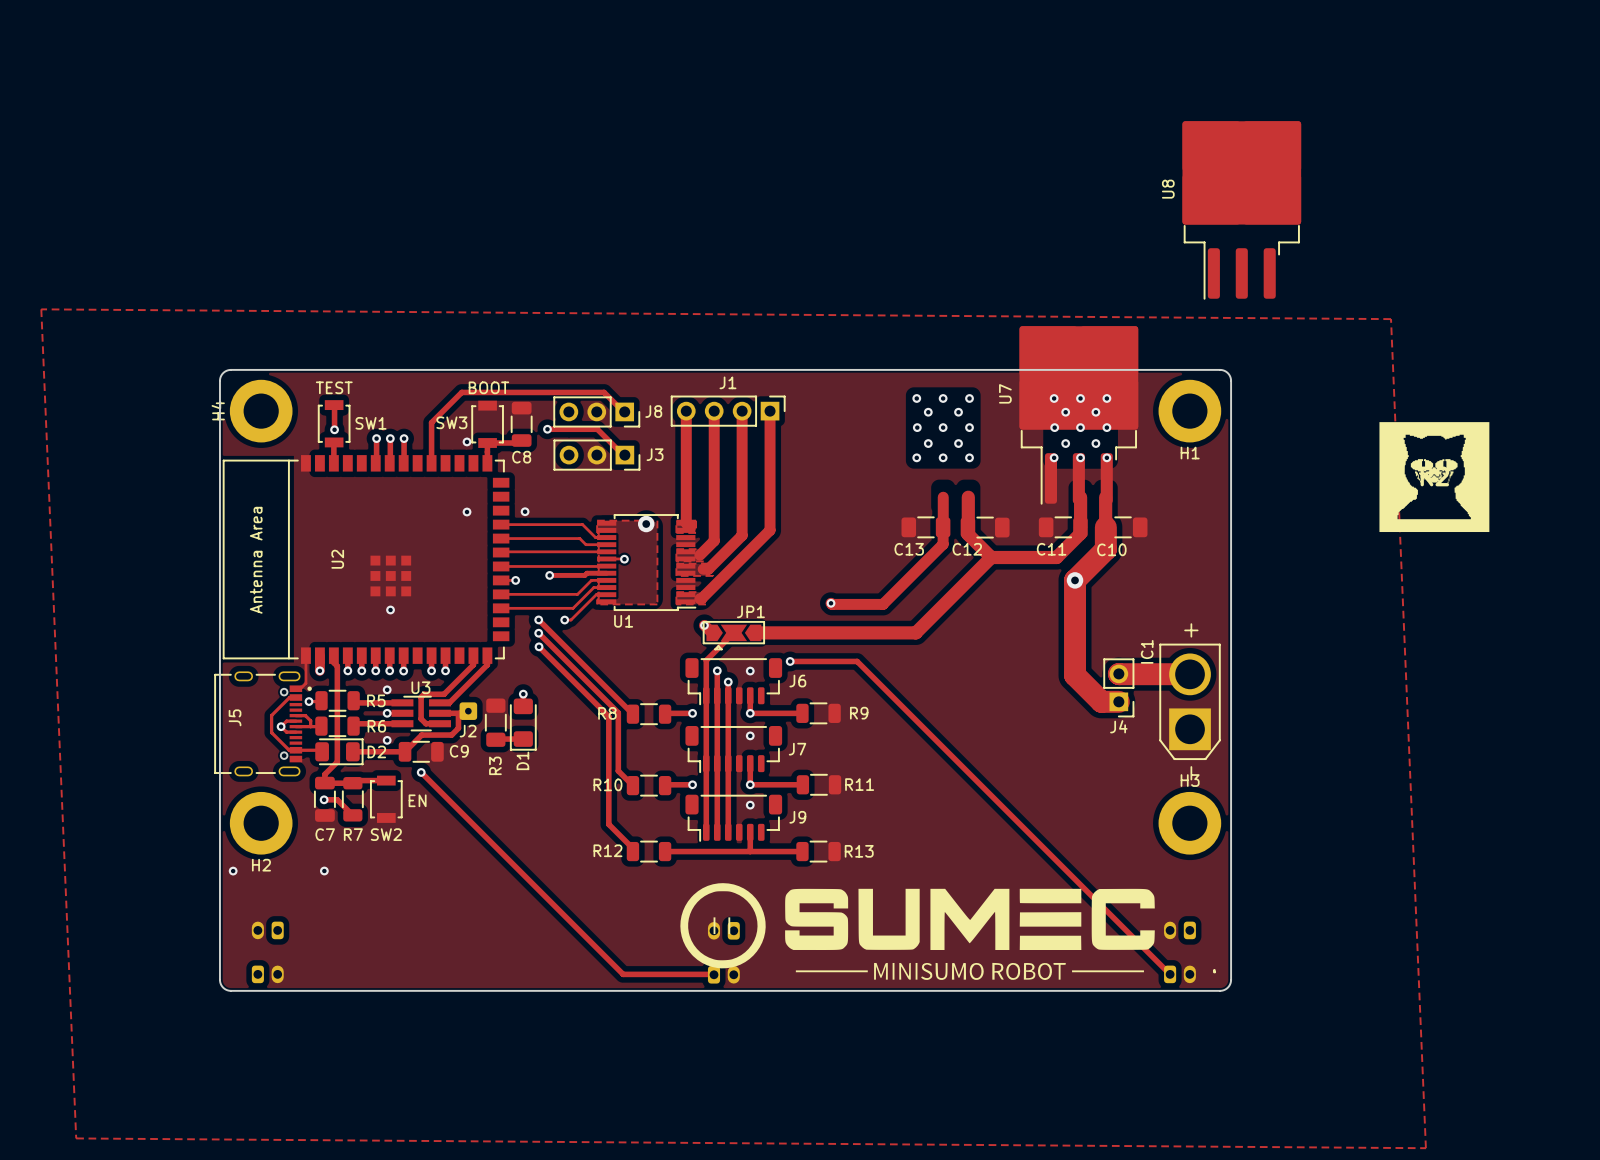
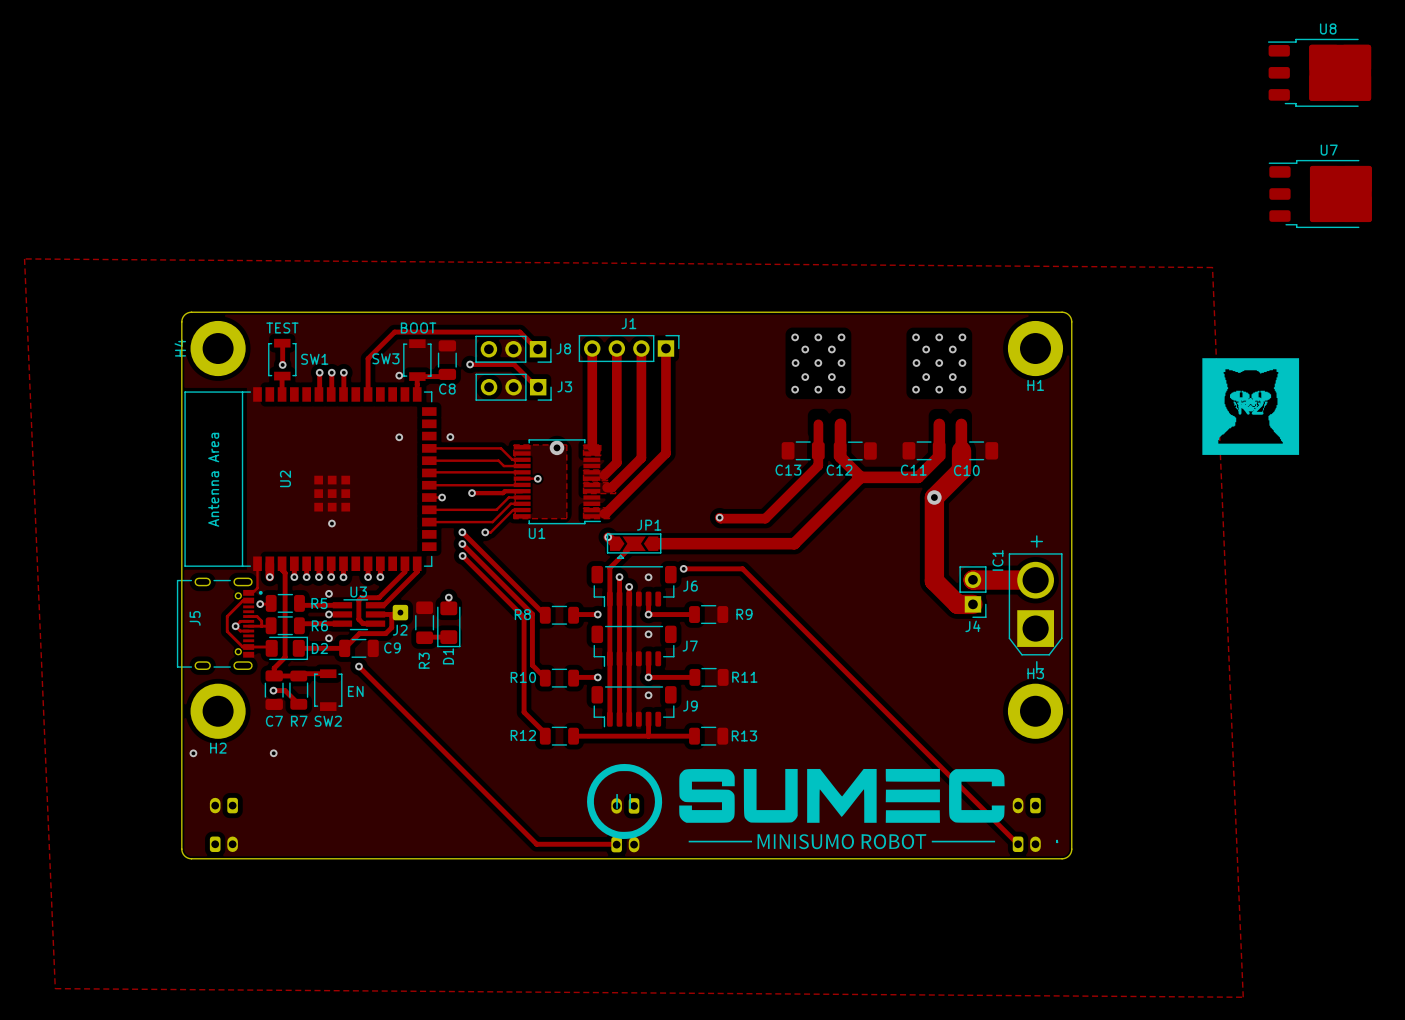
U8 footprint: [1182, 121, 1302, 300] -> [1268, 38, 1372, 107]
U8 name position: U8 (1168, 189) -> U8 (1328, 28)
U7 footprint: [1019, 326, 1139, 505] -> [1268, 160, 1372, 228]
U7 name position: U7 (1005, 393) -> U7 (1329, 150)

